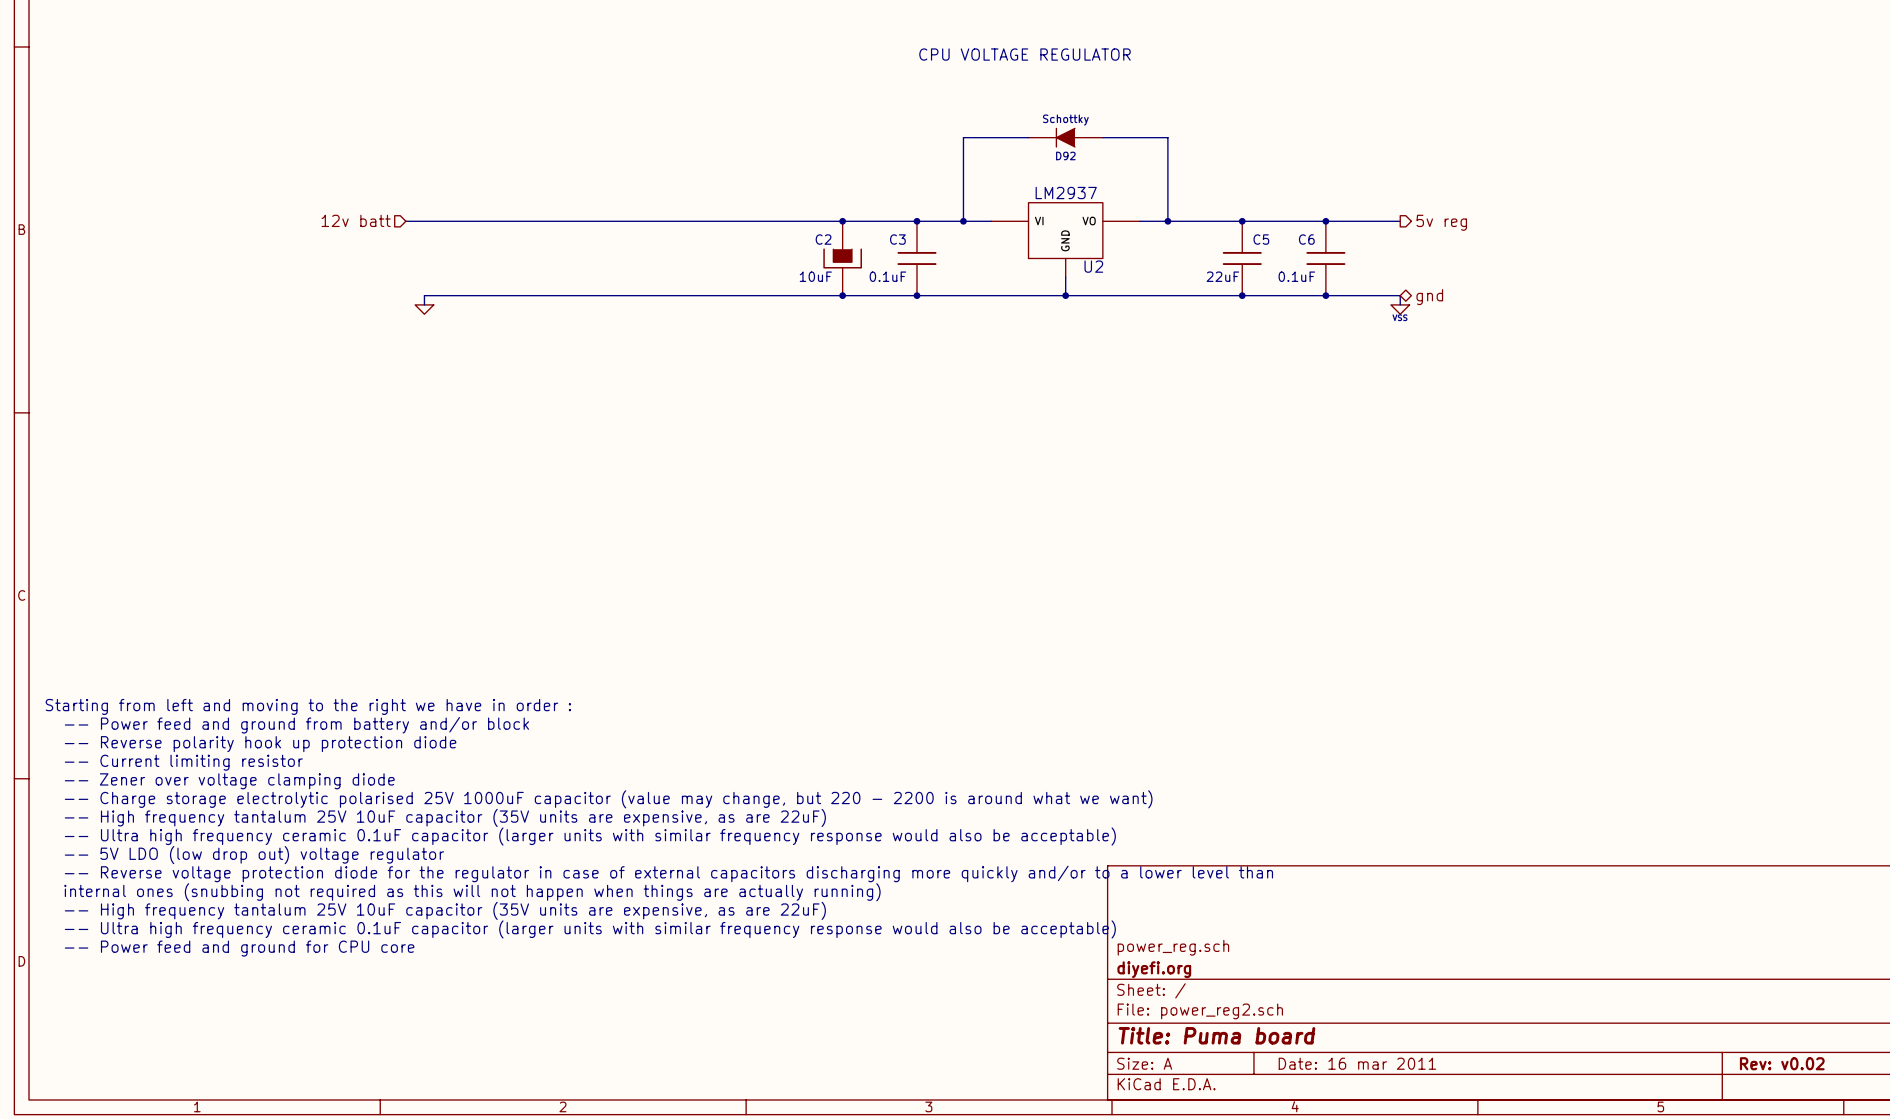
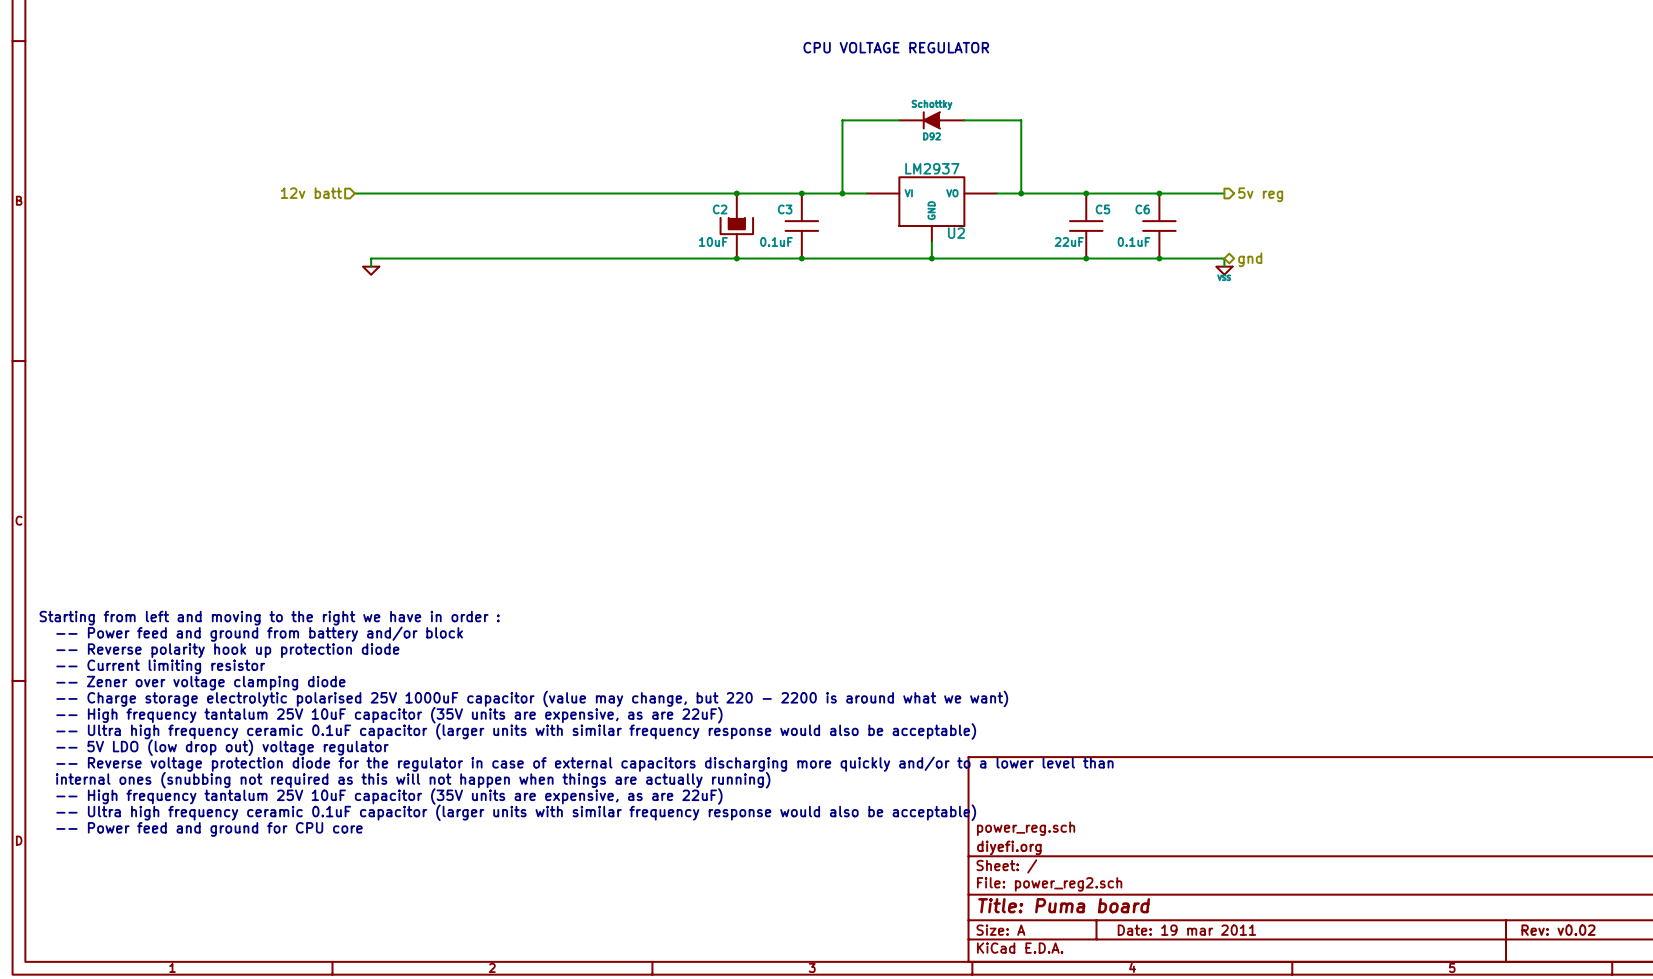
title block: Date: 16 mar 2011 (1357, 1063) -> Date: 19 mar 2011 (1186, 930)

